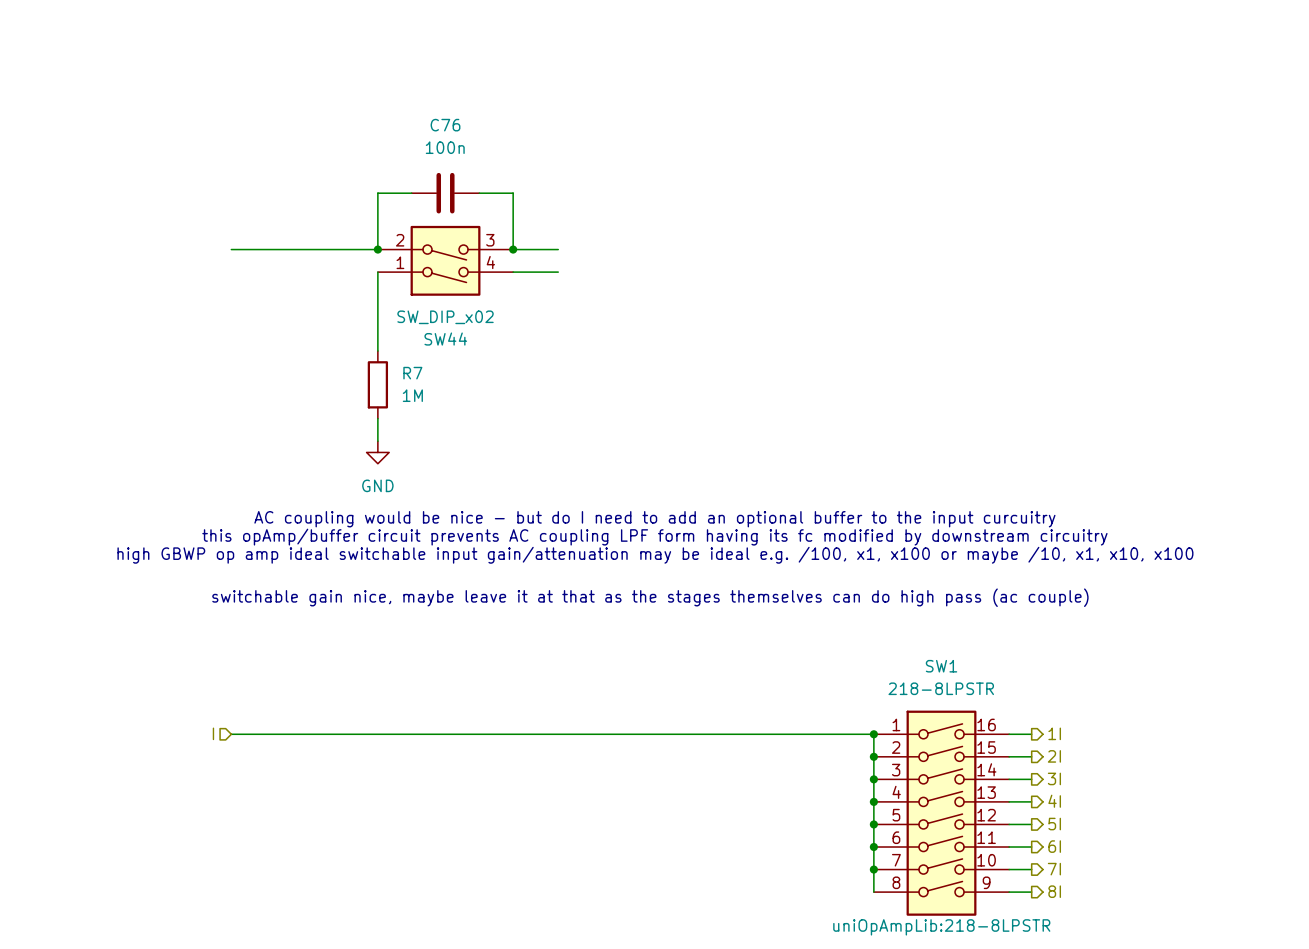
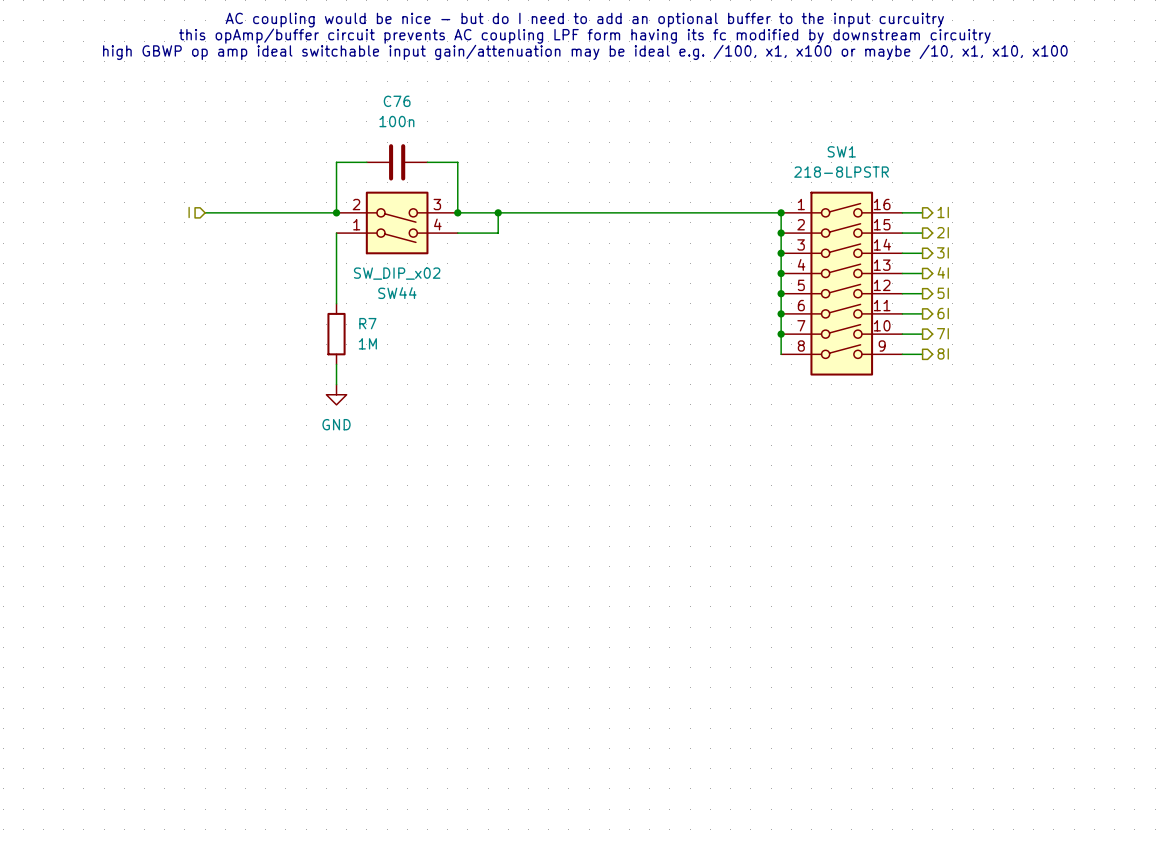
text: none -> AC coupling would be nice - but do I need to add an optional buffer to the input curcuitry (584, 20)
text: none -> this opAmp/buffer circuit prevents AC coupling LPF form having its fc modified by downstream circuitry (584, 36)
text: none -> high GBWP op amp ideal switchable input gain/attenuation may be ideal e.g. /100, x1, x100 or maybe /10, x1, x10, x100 (585, 52)
hierarchical label: none -> I (189, 212)
junction: none -> (498, 212)
junction: none -> (781, 212)
wire: none -> (902, 212) (922, 212)
hierarchical label: none -> 1I (943, 212)
hierarchical label: none -> 2I (942, 232)
wire: none -> (498, 233) (498, 212) (781, 212) (781, 354)
junction: none -> (781, 233)
wire: none -> (902, 233) (922, 233)
junction: none -> (781, 253)
wire: none -> (902, 253) (922, 253)
hierarchical label: none -> 3I (942, 252)
hierarchical label: none -> 4I (943, 272)
junction: none -> (781, 273)
wire: none -> (902, 273) (922, 273)
junction: none -> (781, 293)
wire: none -> (902, 293) (922, 293)
hierarchical label: none -> 5I (943, 293)
hierarchical label: none -> 6I (943, 313)
junction: none -> (781, 313)
wire: none -> (902, 313) (922, 313)
junction: none -> (781, 334)
wire: none -> (902, 334) (922, 334)
hierarchical label: none -> 7I (942, 333)
hierarchical label: none -> 8I (943, 353)
wire: none -> (902, 354) (922, 354)
text: AC coupling would be nice - but do I need to add an optional buffer to the input curcuitry (654, 519) -> none
text: this opAmp/buffer circuit prevents AC coupling LPF form having its fc modified by downstream circuitry (654, 537) -> none
text: high GBWP op amp ideal switchable input gain/attenuation may be ideal e.g. /100, x1, x100 or maybe /10, x1, x10, x100 (655, 555) -> none
text: switchable gain nice, maybe leave it at that as the stages themselves can do high pass (ac couple) (650, 597) -> none
hierarchical label: I (213, 733) -> none
hierarchical label: 1I (1054, 733) -> none
wire: (231, 734) (873, 734) (873, 892) -> none
junction: (873, 734) -> none
wire: (1009, 734) (1031, 734) -> none
junction: (873, 756) -> none
wire: (1009, 756) (1031, 756) -> none
hierarchical label: 2I (1054, 756) -> none
hierarchical label: 3I (1054, 778) -> none
junction: (873, 779) -> none
wire: (1009, 779) (1031, 779) -> none
junction: (873, 801) -> none
wire: (1009, 801) (1031, 801) -> none
hierarchical label: 4I (1054, 801) -> none
SW1 position: (941, 813) -> (841, 283)
junction: (873, 824) -> none
wire: (1009, 824) (1031, 824) -> none
hierarchical label: 5I (1054, 824) -> none
hierarchical label: 6I (1054, 846) -> none
junction: (873, 847) -> none
wire: (1009, 847) (1031, 847) -> none
junction: (873, 869) -> none
wire: (1009, 869) (1031, 869) -> none
hierarchical label: 7I (1054, 869) -> none
hierarchical label: 8I (1054, 891) -> none
wire: (1009, 892) (1031, 892) -> none
SW1 text: uniOpAmpLib:218-8LPSTR (941, 927) -> none

